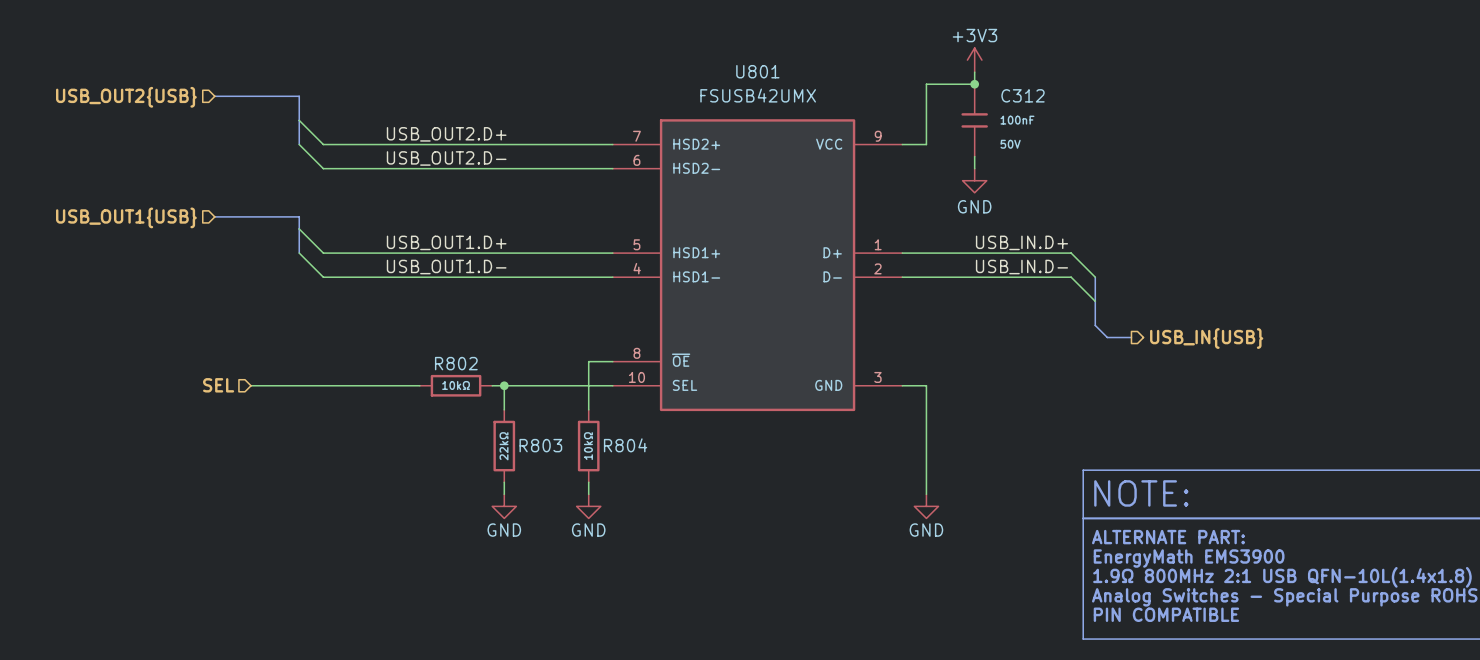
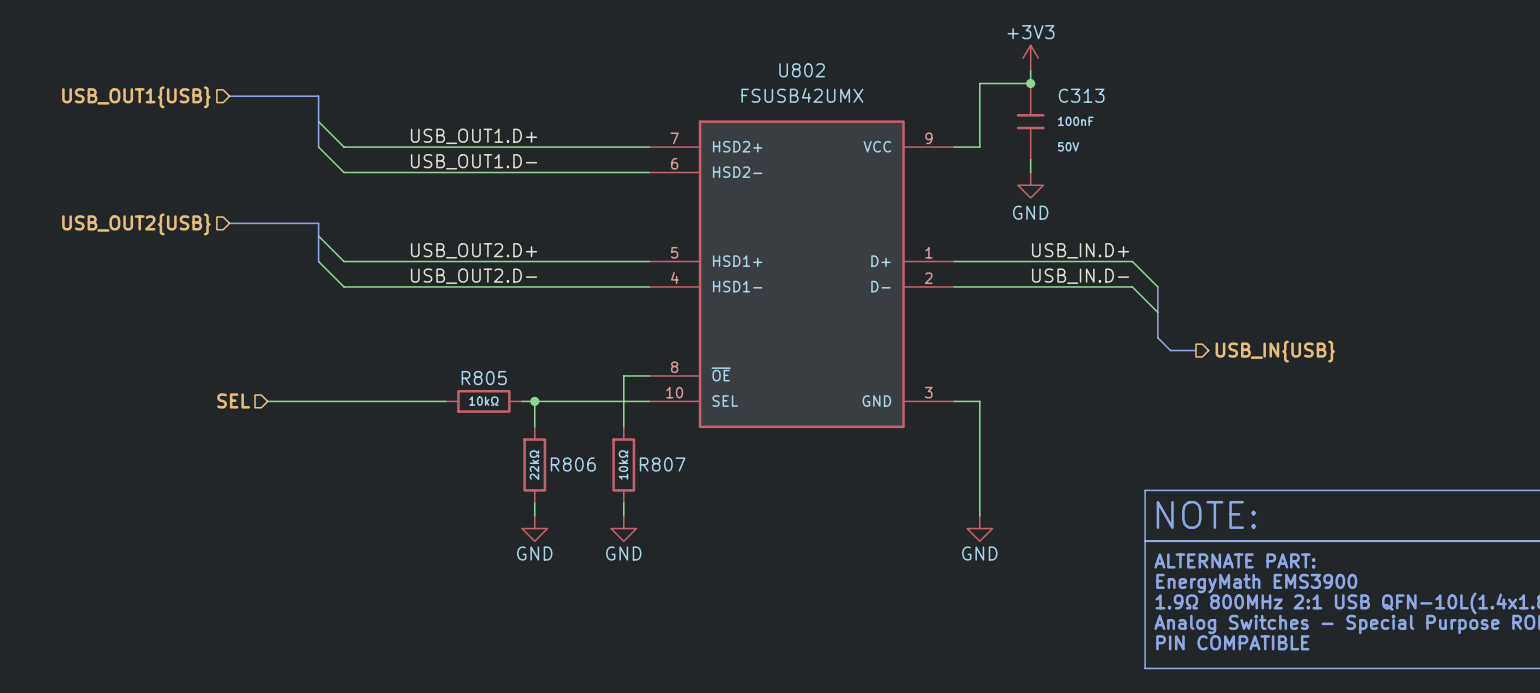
U801 name: U801 (757, 71) -> U802 (802, 70)
C312 name: C312 (1023, 95) -> C313 (1081, 95)
hierarchical label: USB_OUT2{USB} (126, 97) -> USB_OUT1{USB} (136, 97)
label: USB_OUT2.D+ (446, 134) -> USB_OUT1.D+ (474, 136)
label: USB_OUT2.D- (446, 158) -> USB_OUT1.D- (474, 161)
hierarchical label: USB_OUT1{USB} (126, 217) -> USB_OUT2{USB} (136, 224)
label: USB_OUT1.D+ (446, 242) -> USB_OUT2.D+ (474, 250)
label: USB_OUT1.D- (446, 267) -> USB_OUT2.D- (474, 276)
R802 name: R802 (456, 363) -> R805 (484, 378)
R803 name: R803 (540, 445) -> R806 (573, 464)
R804 name: R804 (625, 445) -> R807 (662, 464)

